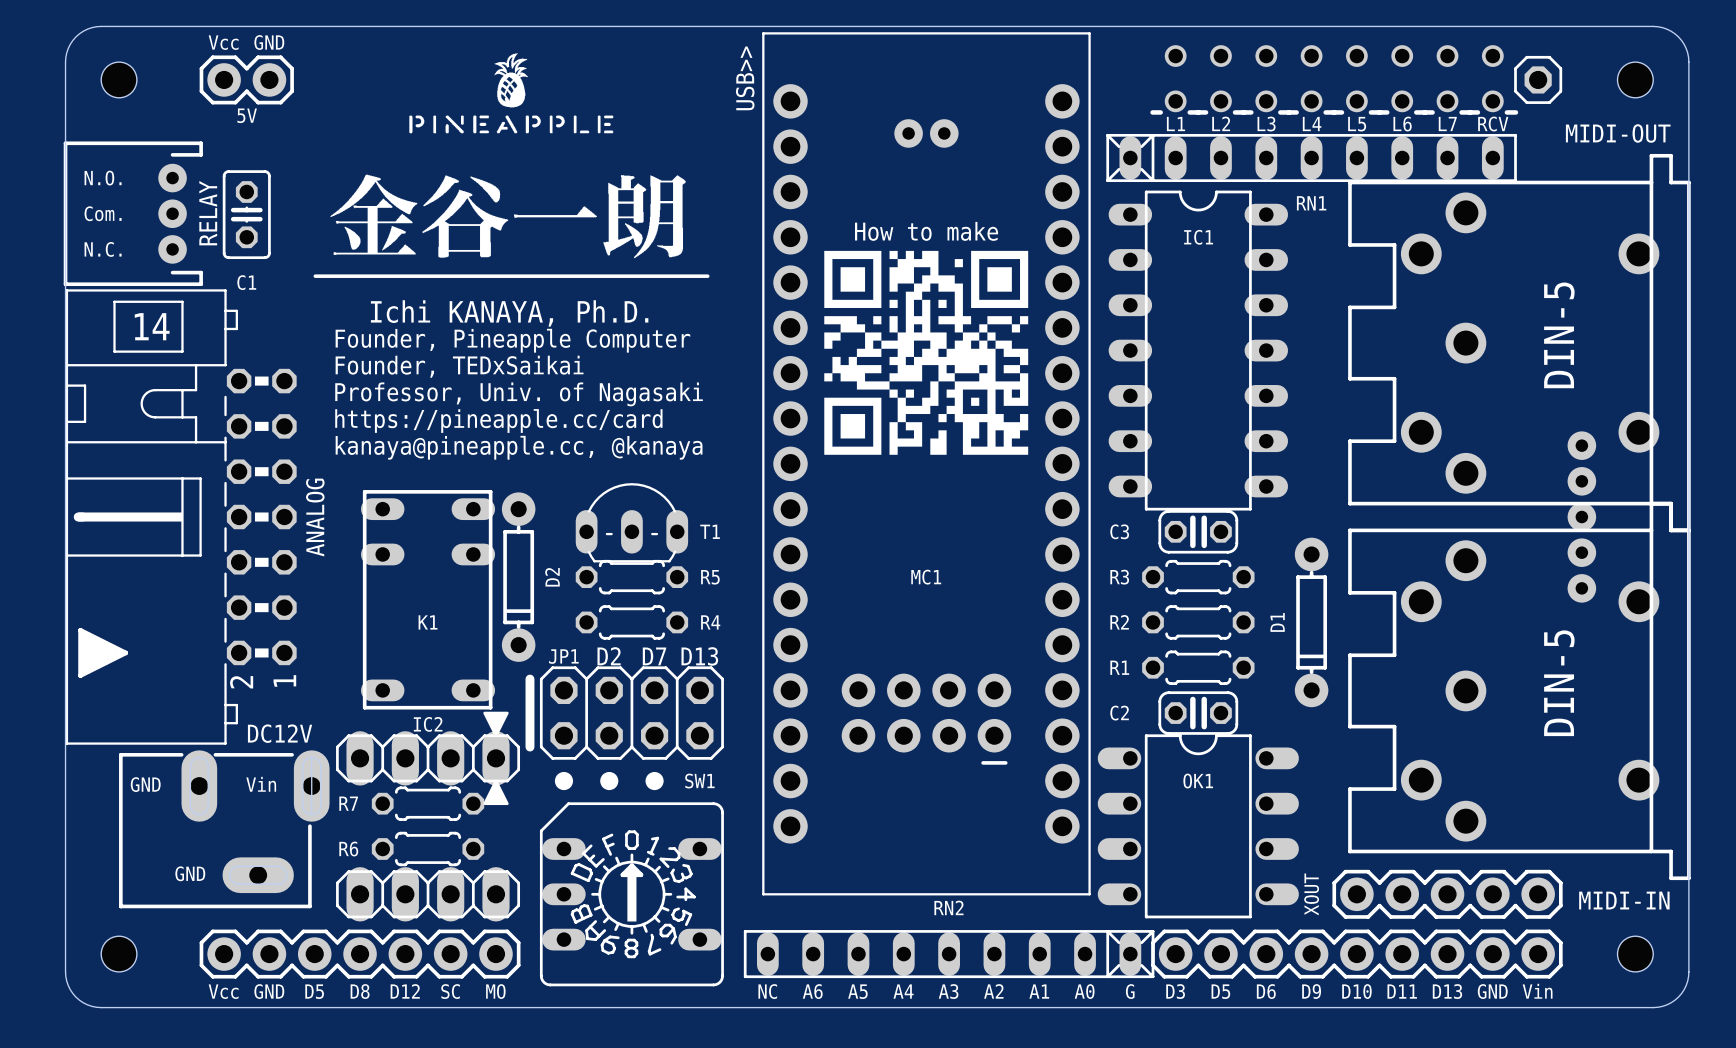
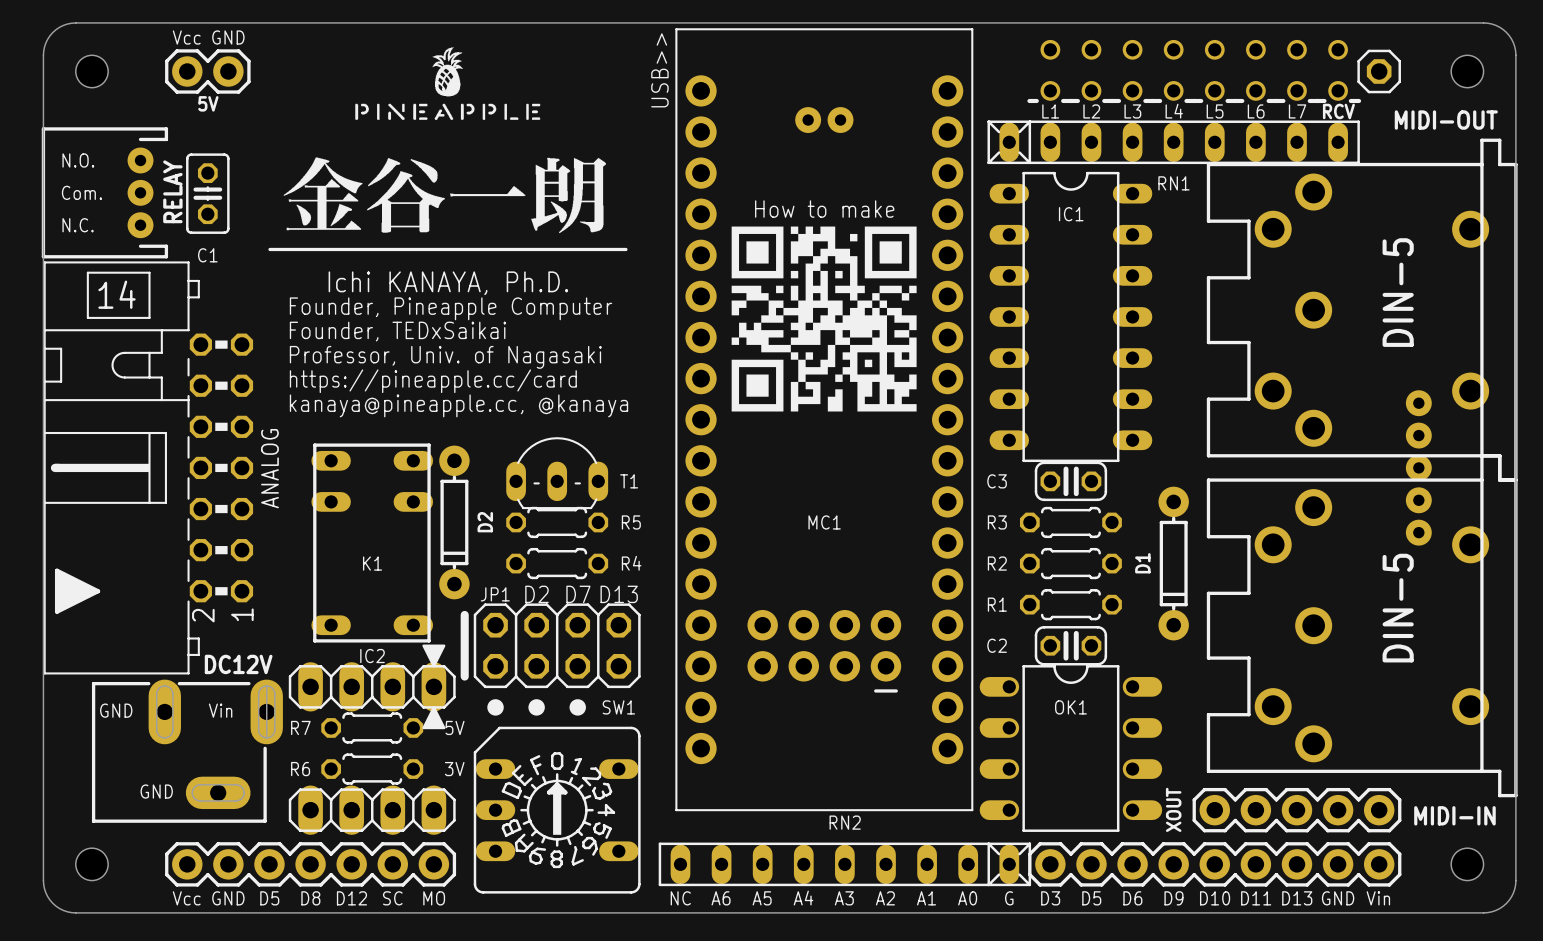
text: none -> 5V (454, 727)
text: none -> 3V (454, 769)

